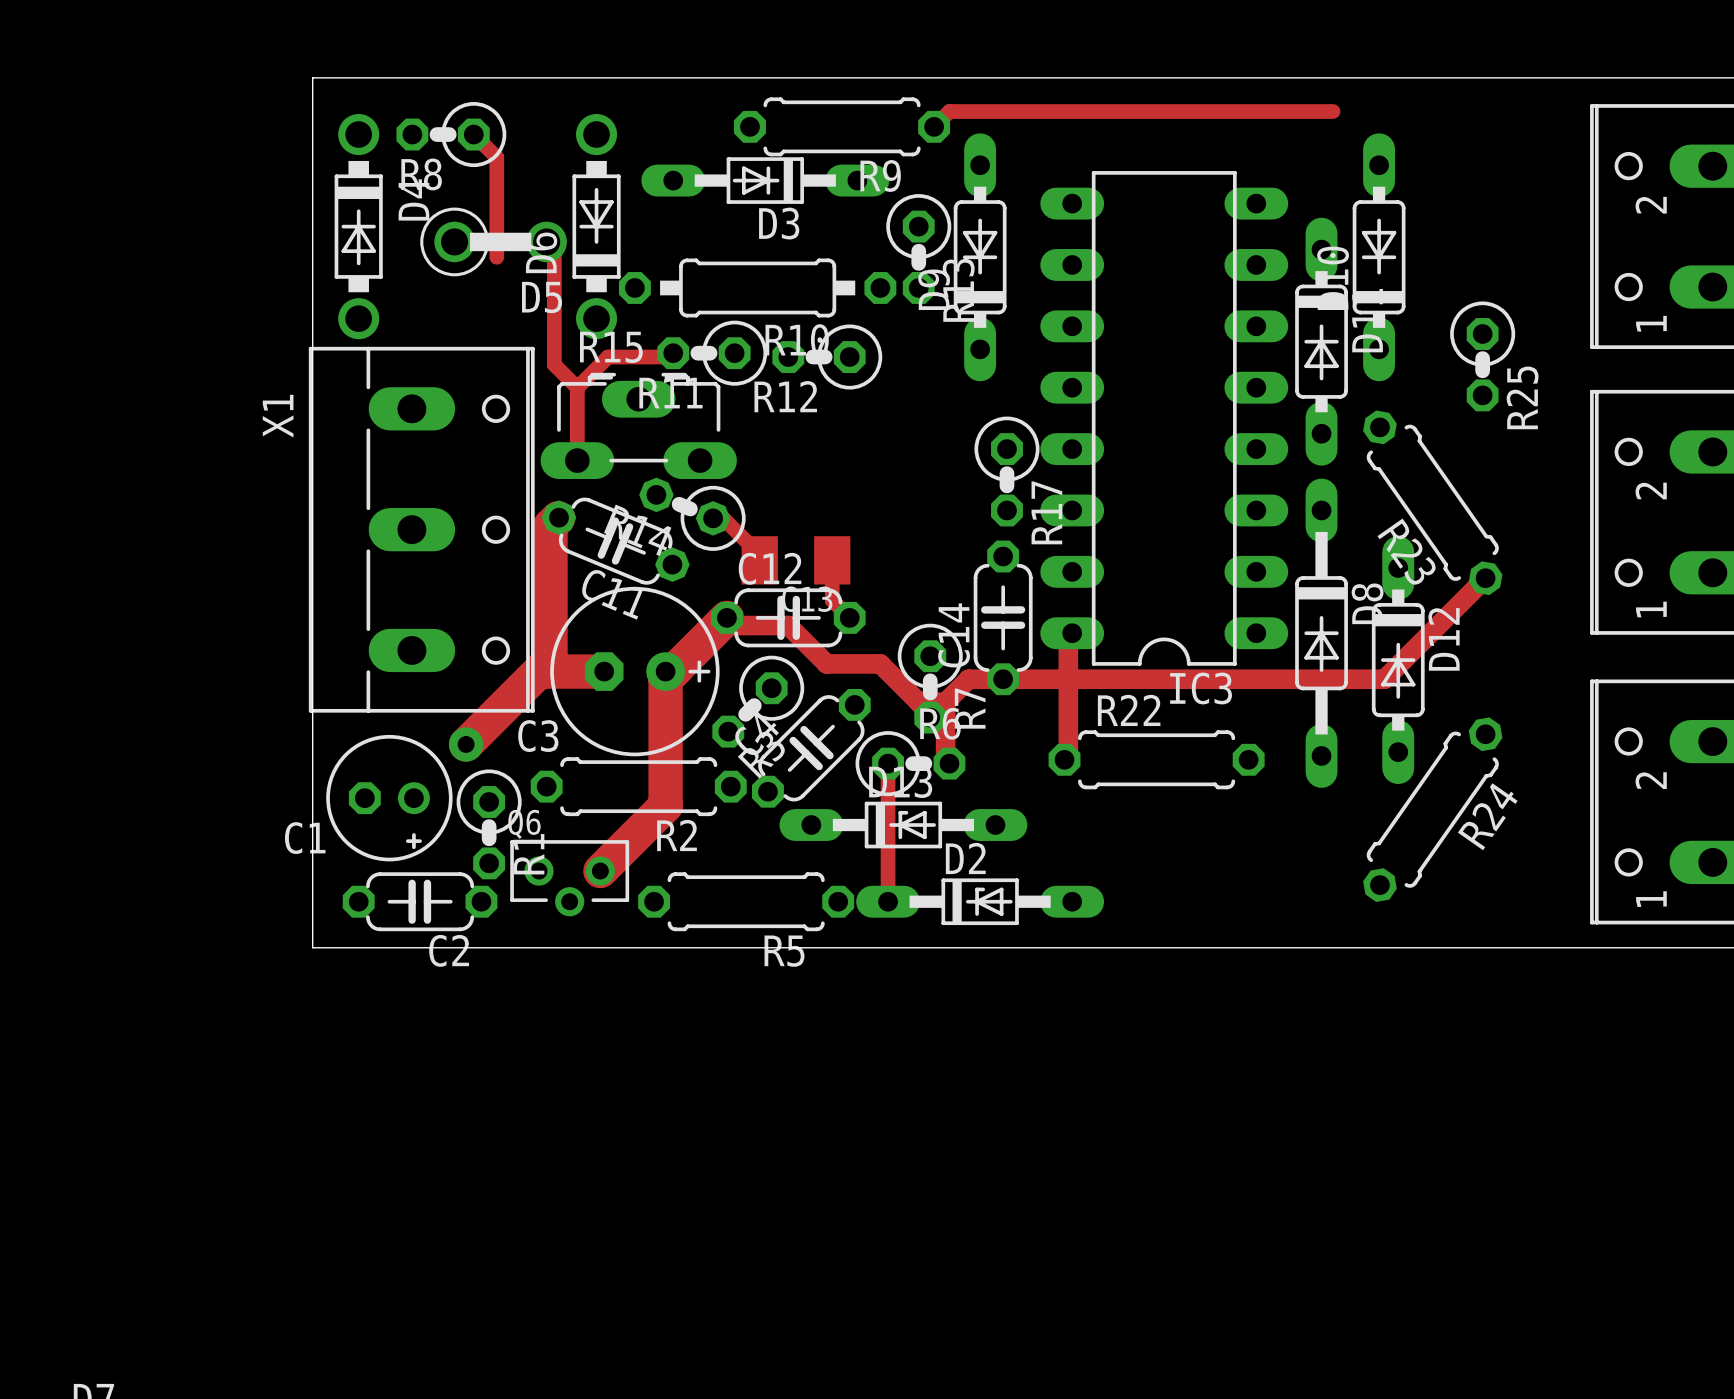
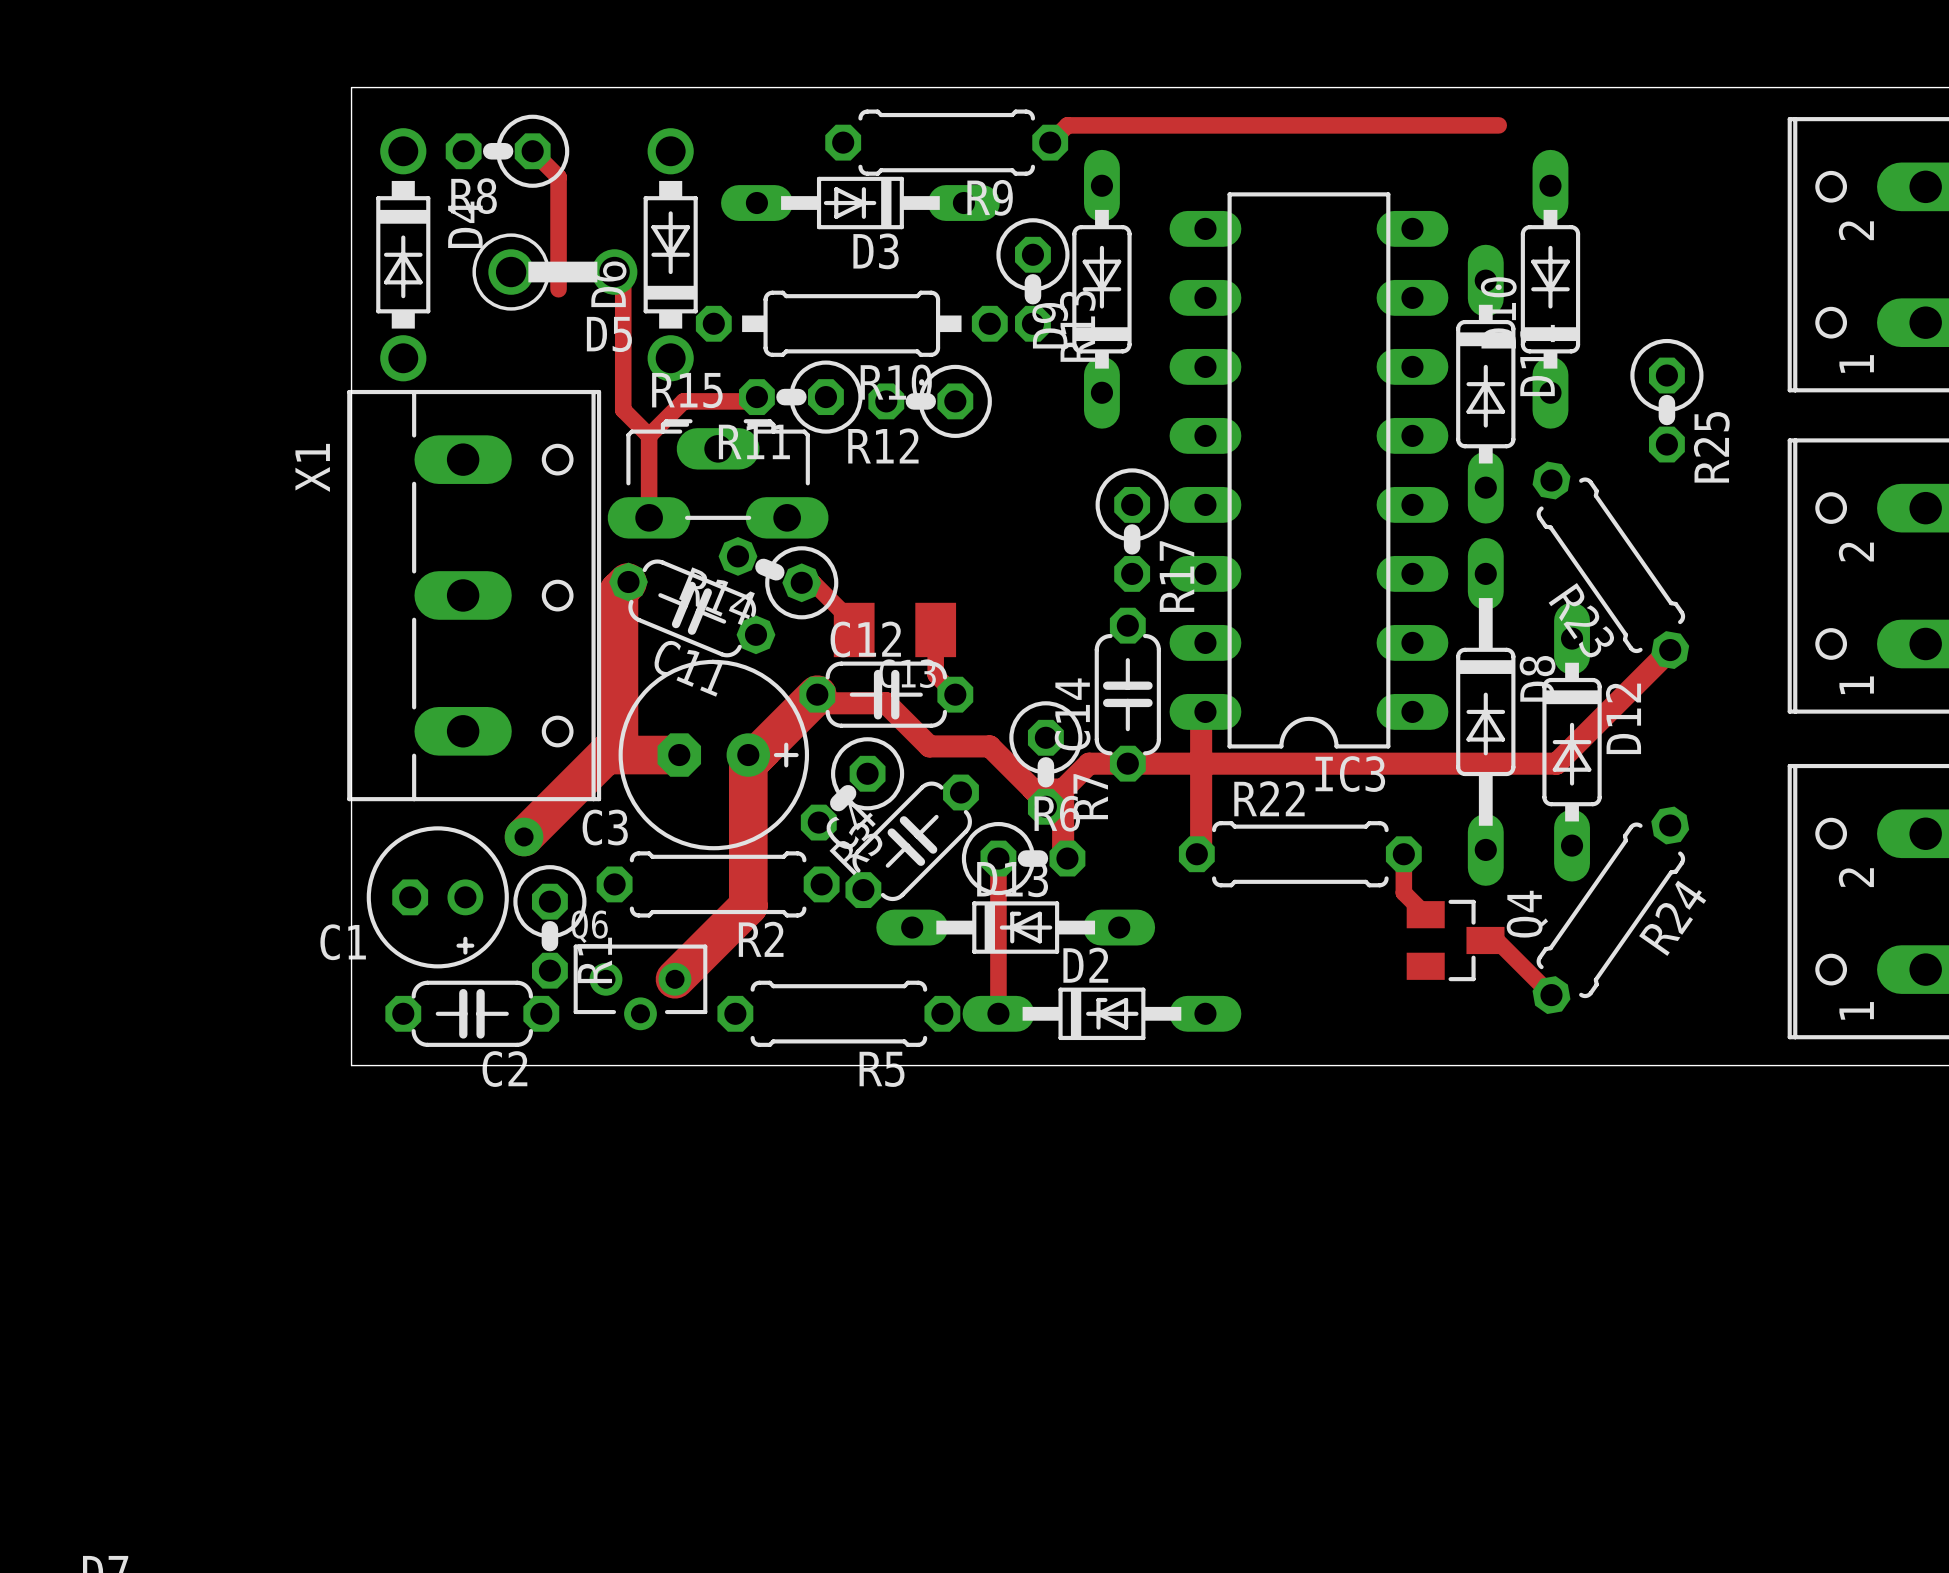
track: none -> (1403, 854) (1403, 892) (1425, 914)
Q4: none -> (1455, 940)
track: none -> (1485, 940) (1496, 940) (1551, 995)

